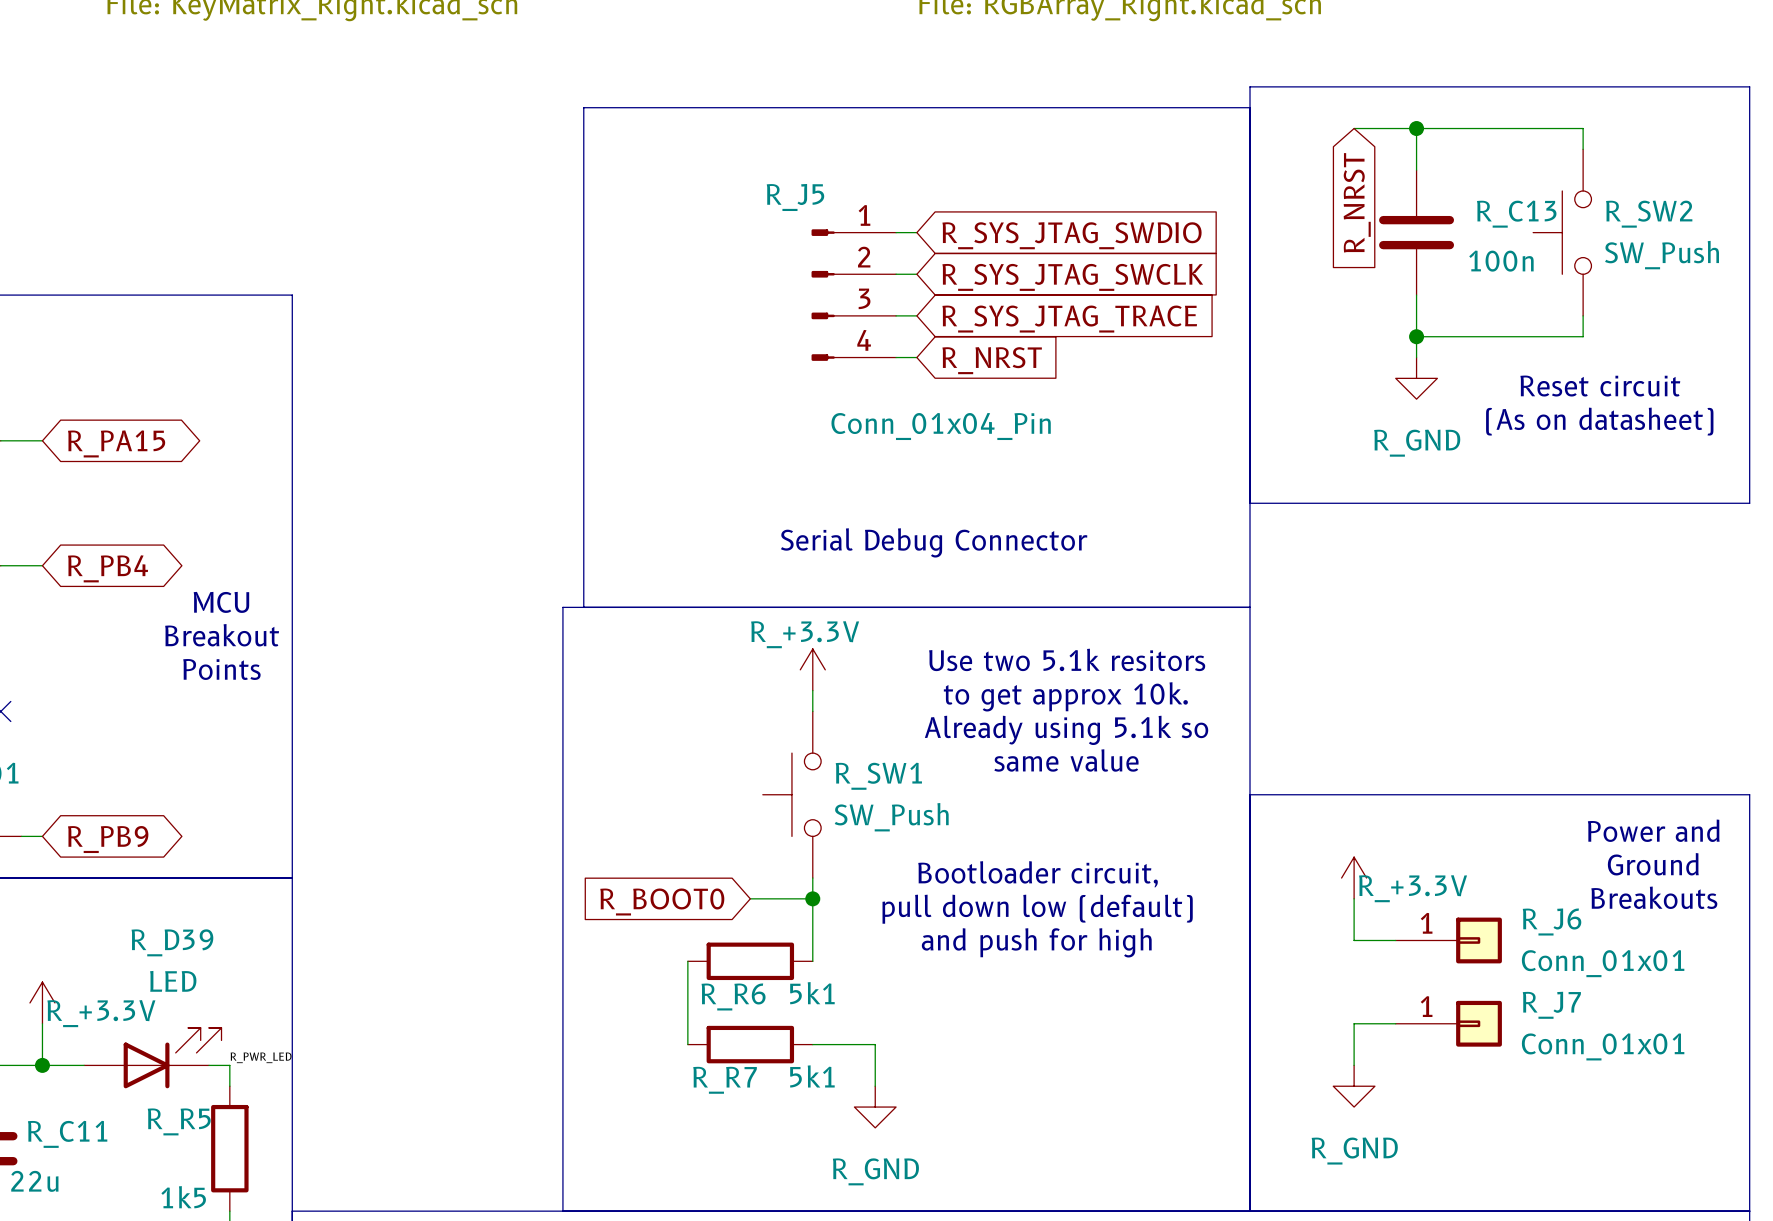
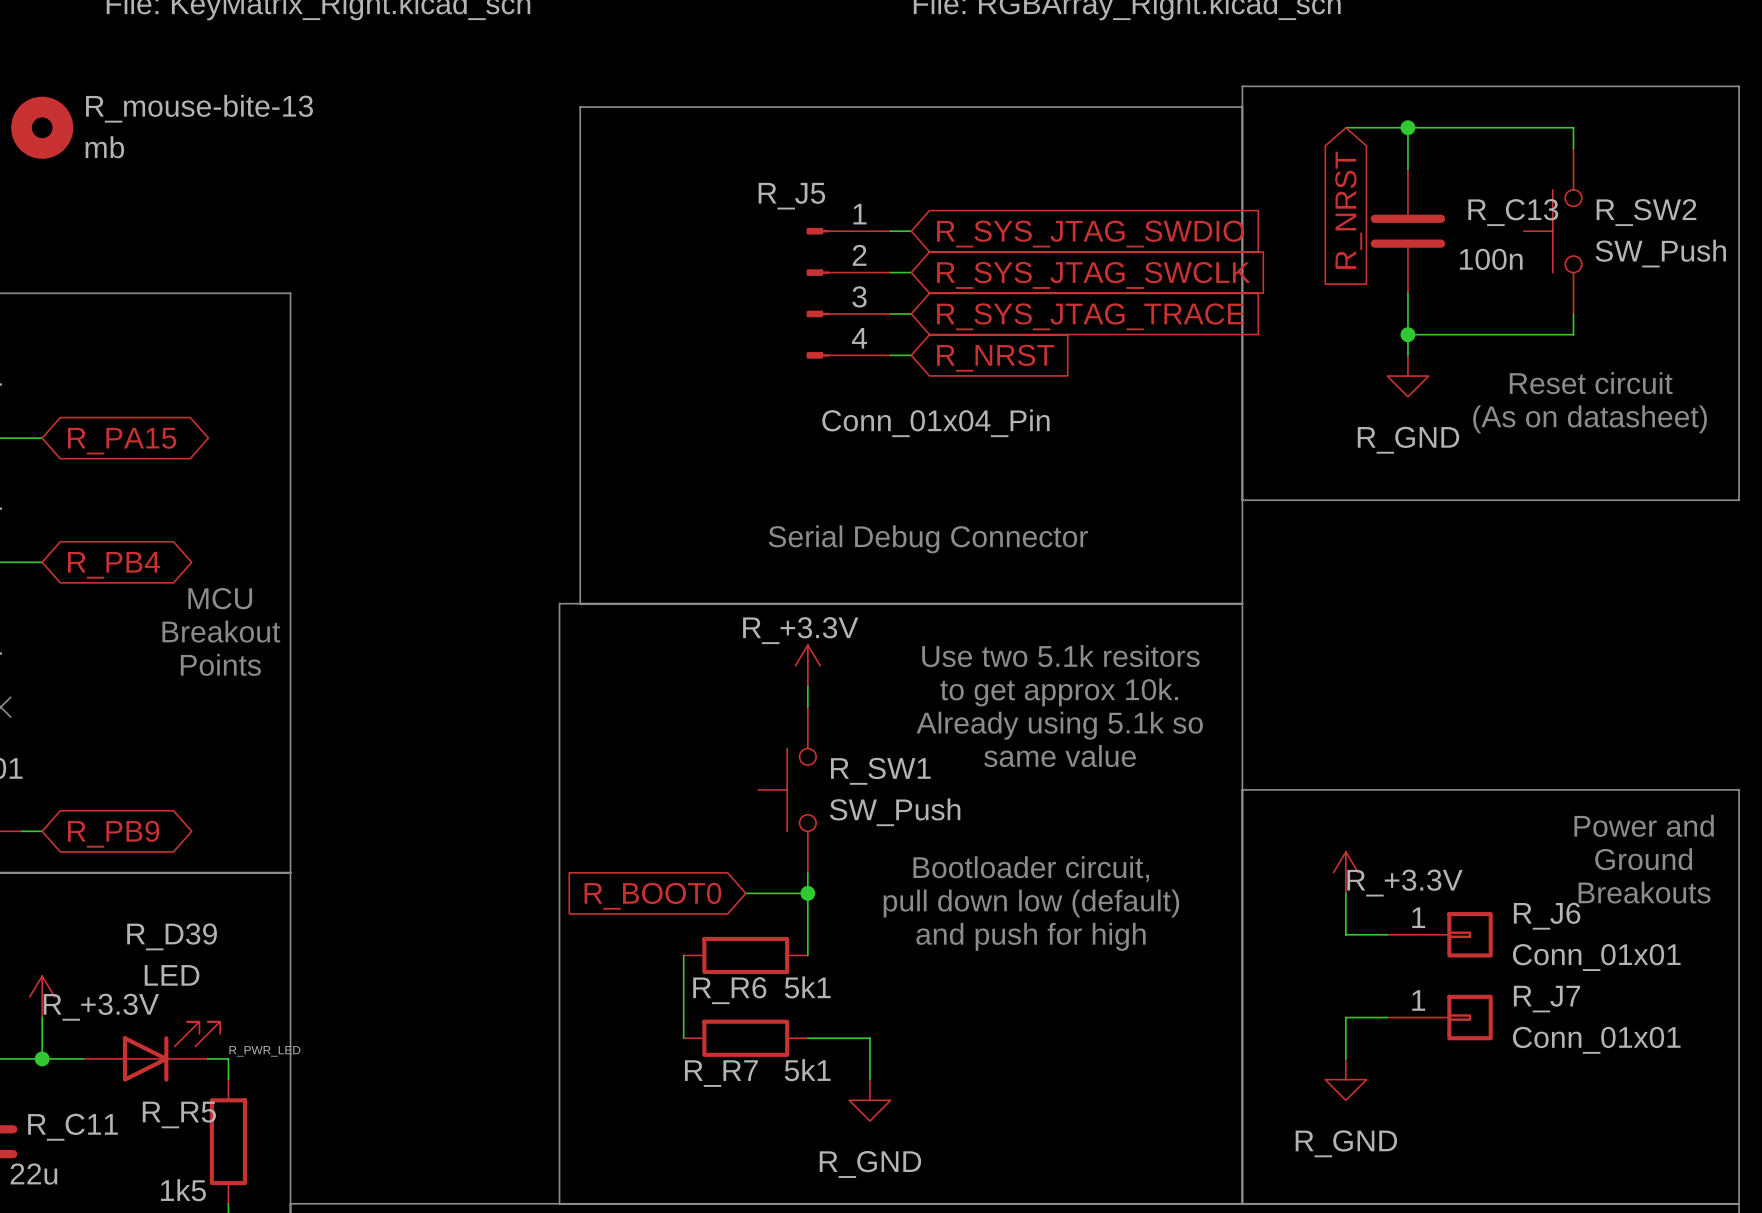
R_mouse-bite-13: none -> mb (42, 127)

